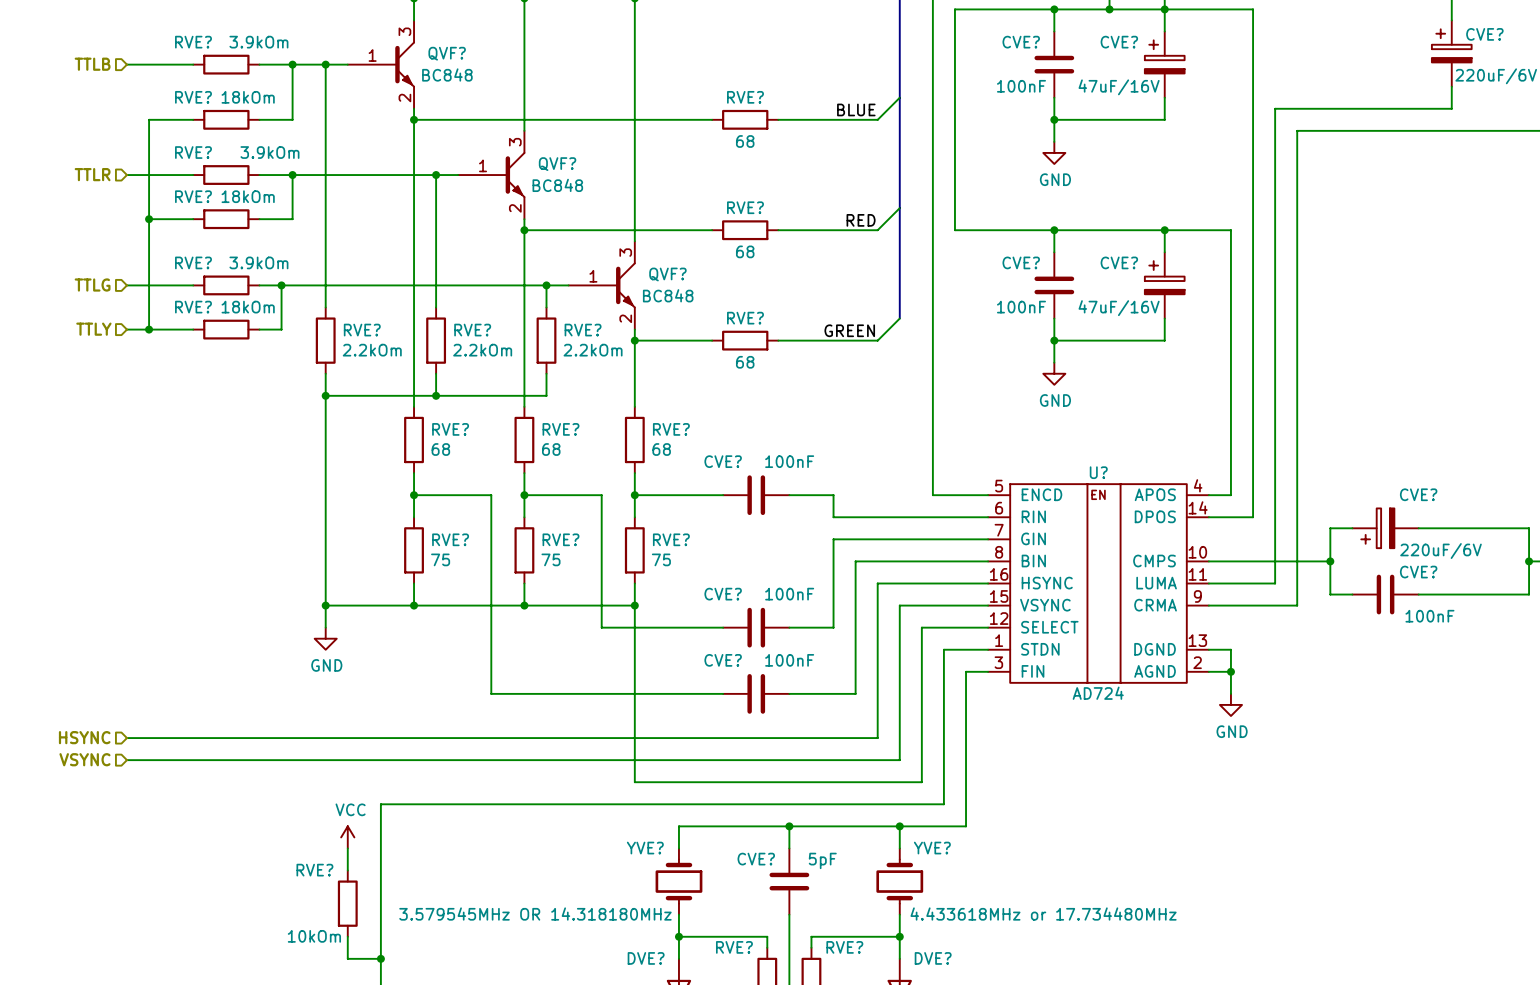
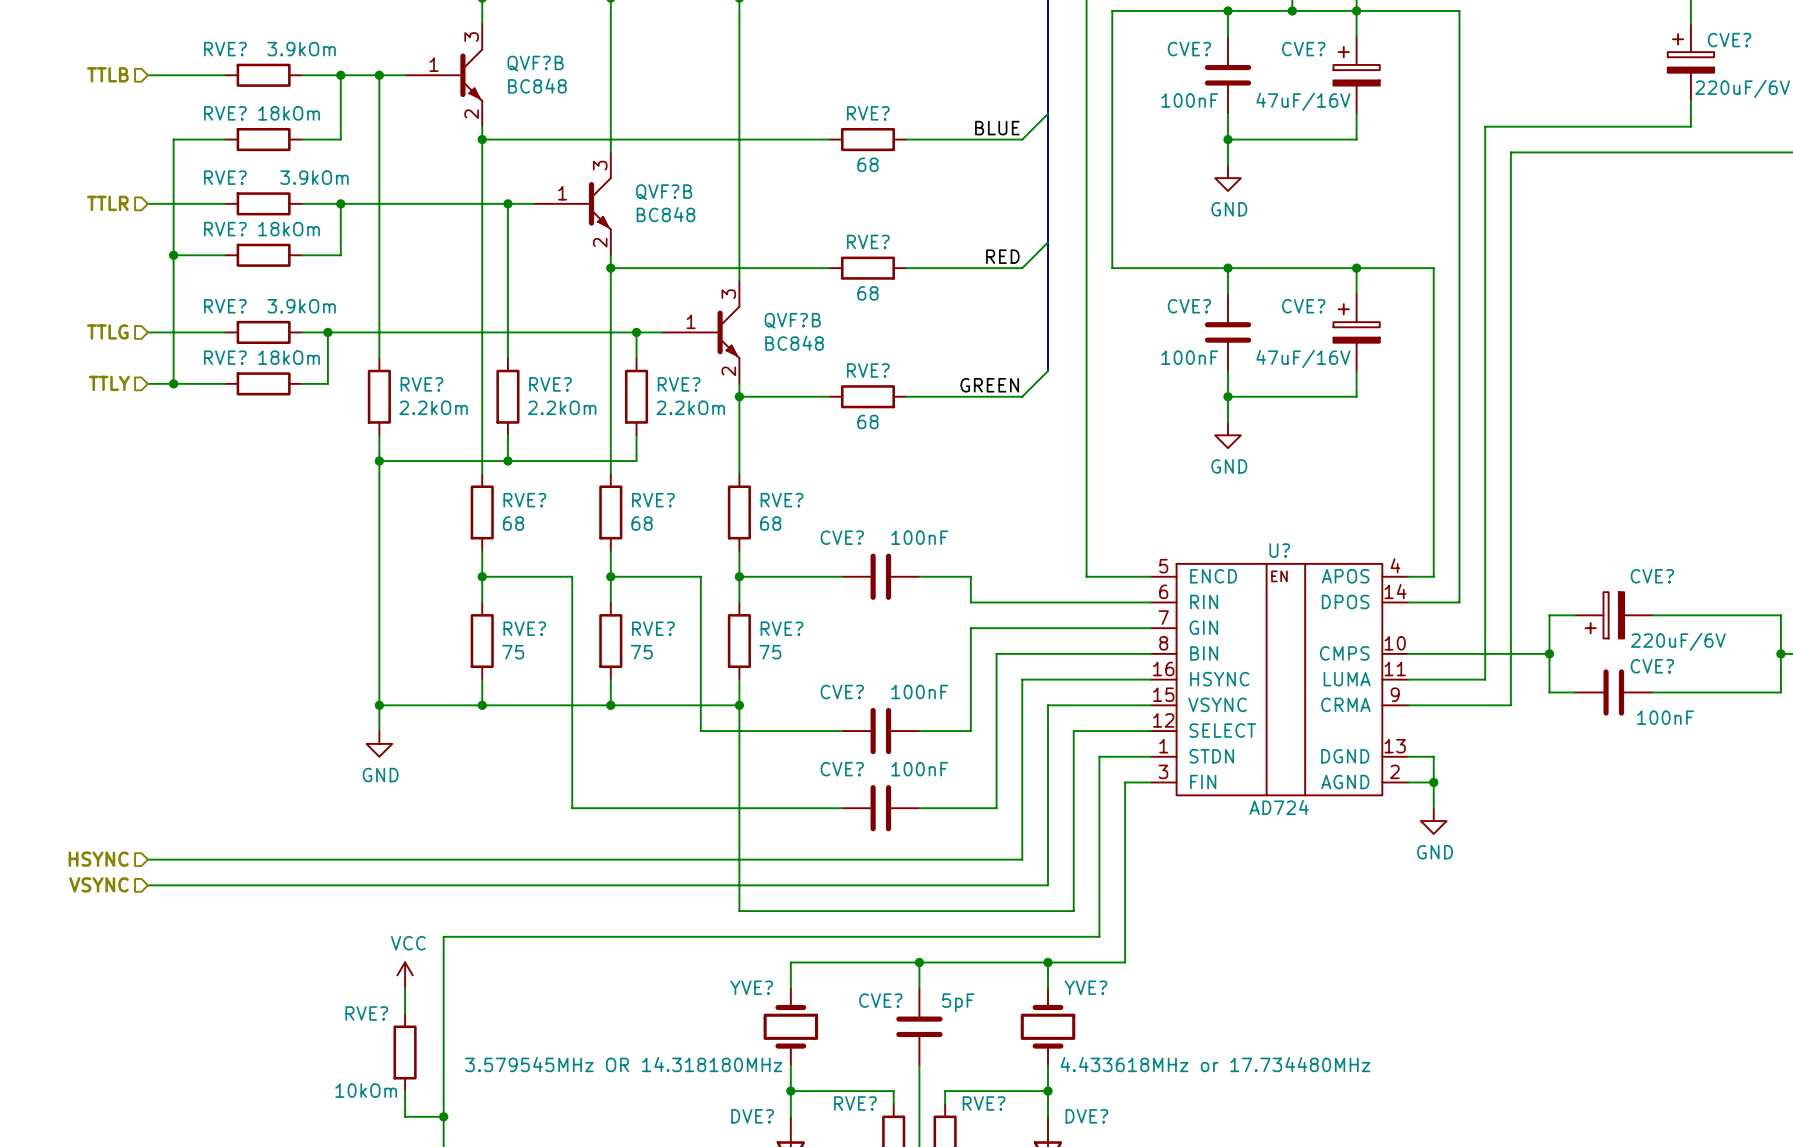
QVF? name: QVF? (447, 53) -> QVF?B (535, 63)
QVF? value position: BC848 (447, 74) -> BC848 (537, 86)
QVF? name: QVF? (557, 164) -> QVF?B (664, 192)
QVF? value position: BC848 (557, 185) -> BC848 (665, 214)
QVF? name: QVF? (667, 274) -> QVF?B (792, 320)
QVF? value position: BC848 (668, 295) -> BC848 (794, 343)

